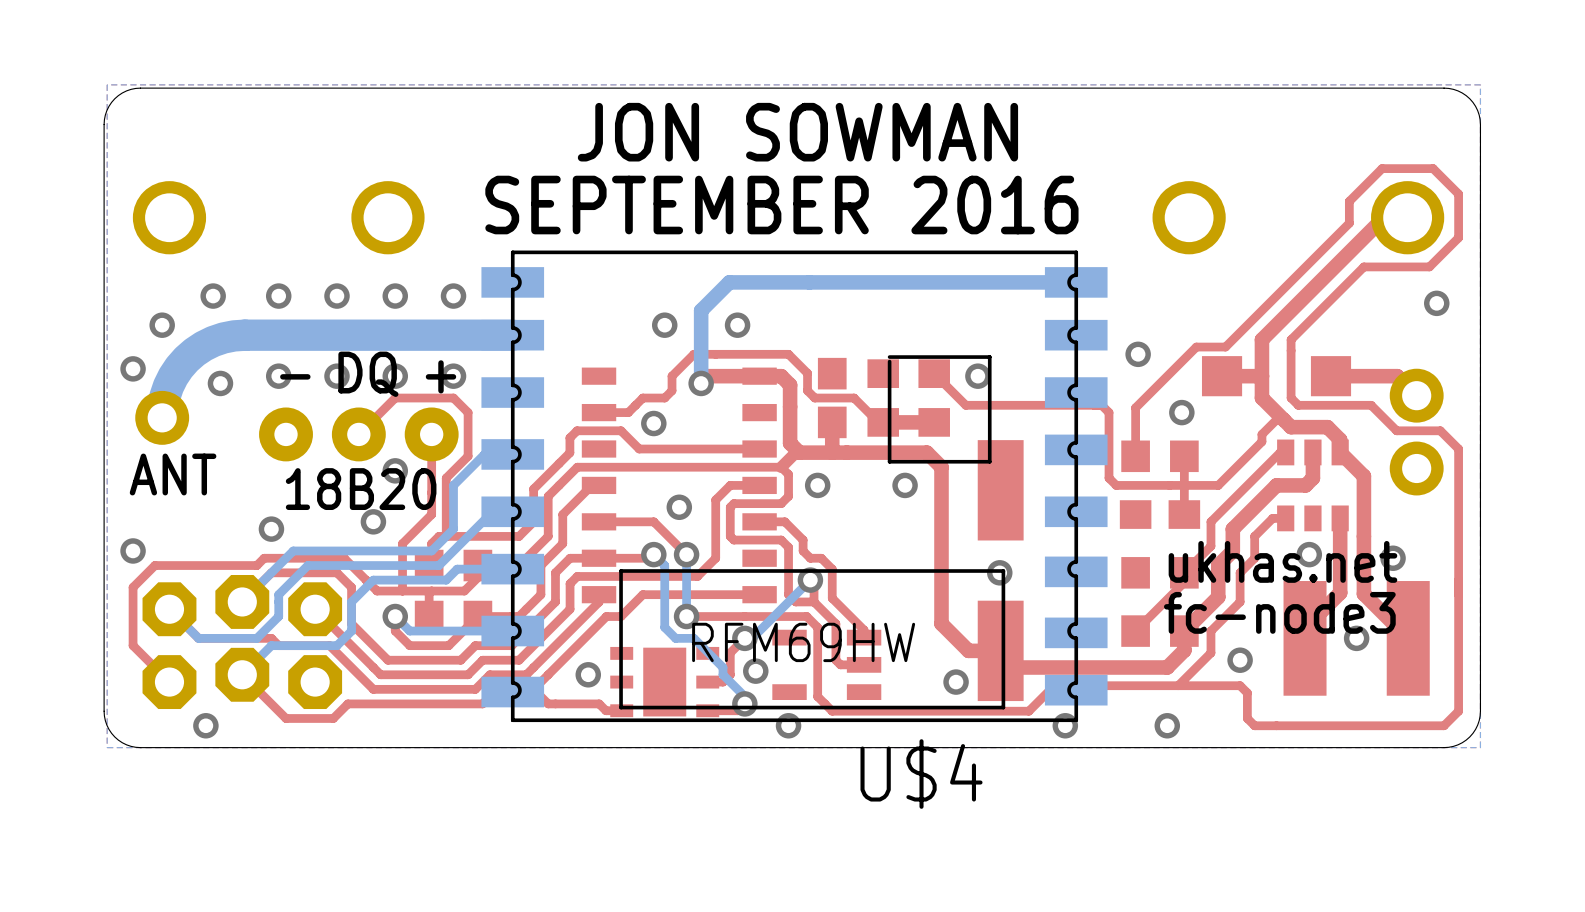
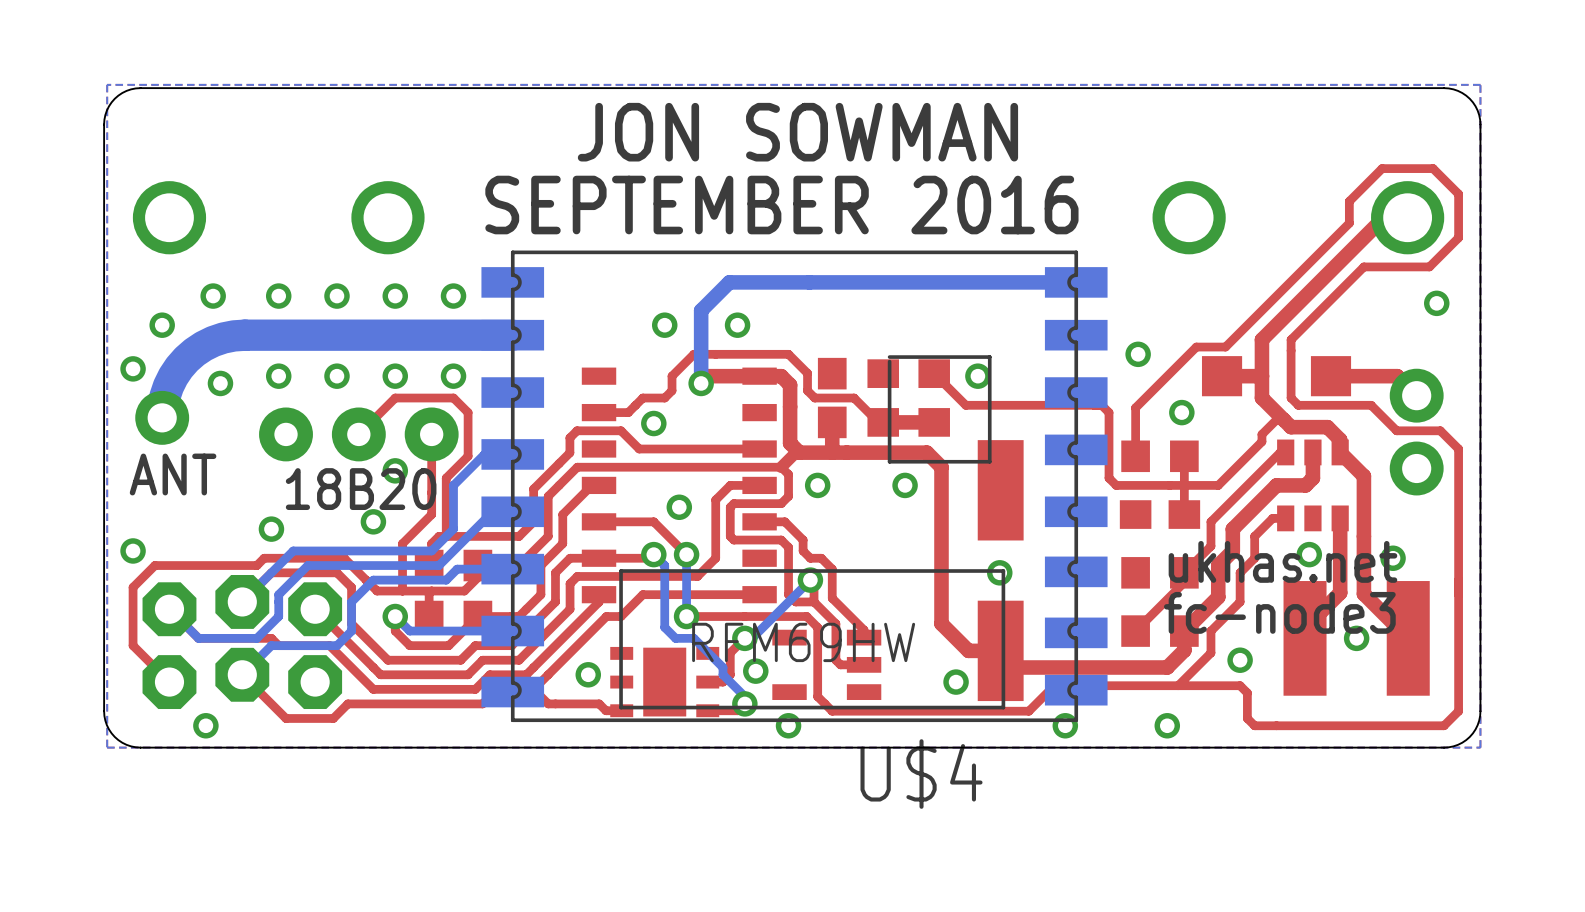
text: DQ (368, 374) -> none
text: - (295, 376) -> none
text: + (440, 376) -> none

